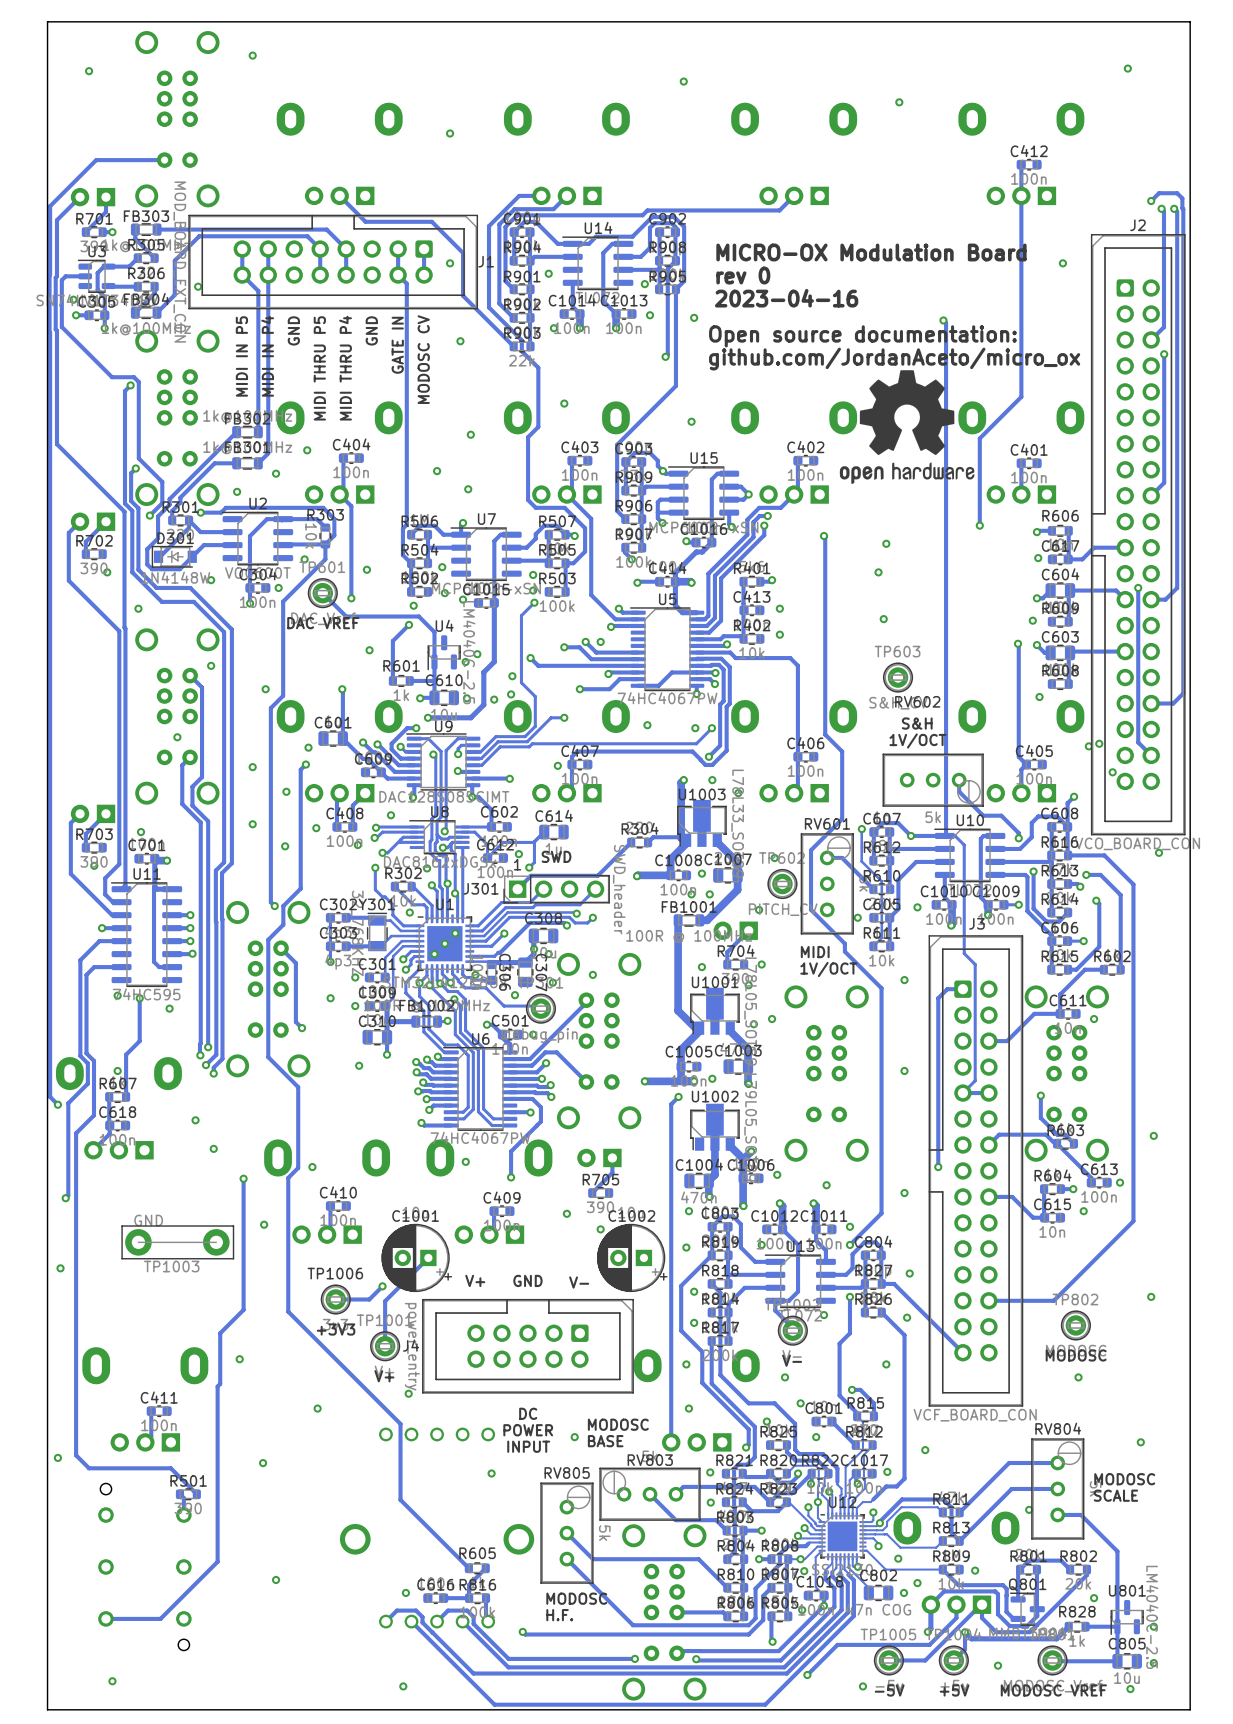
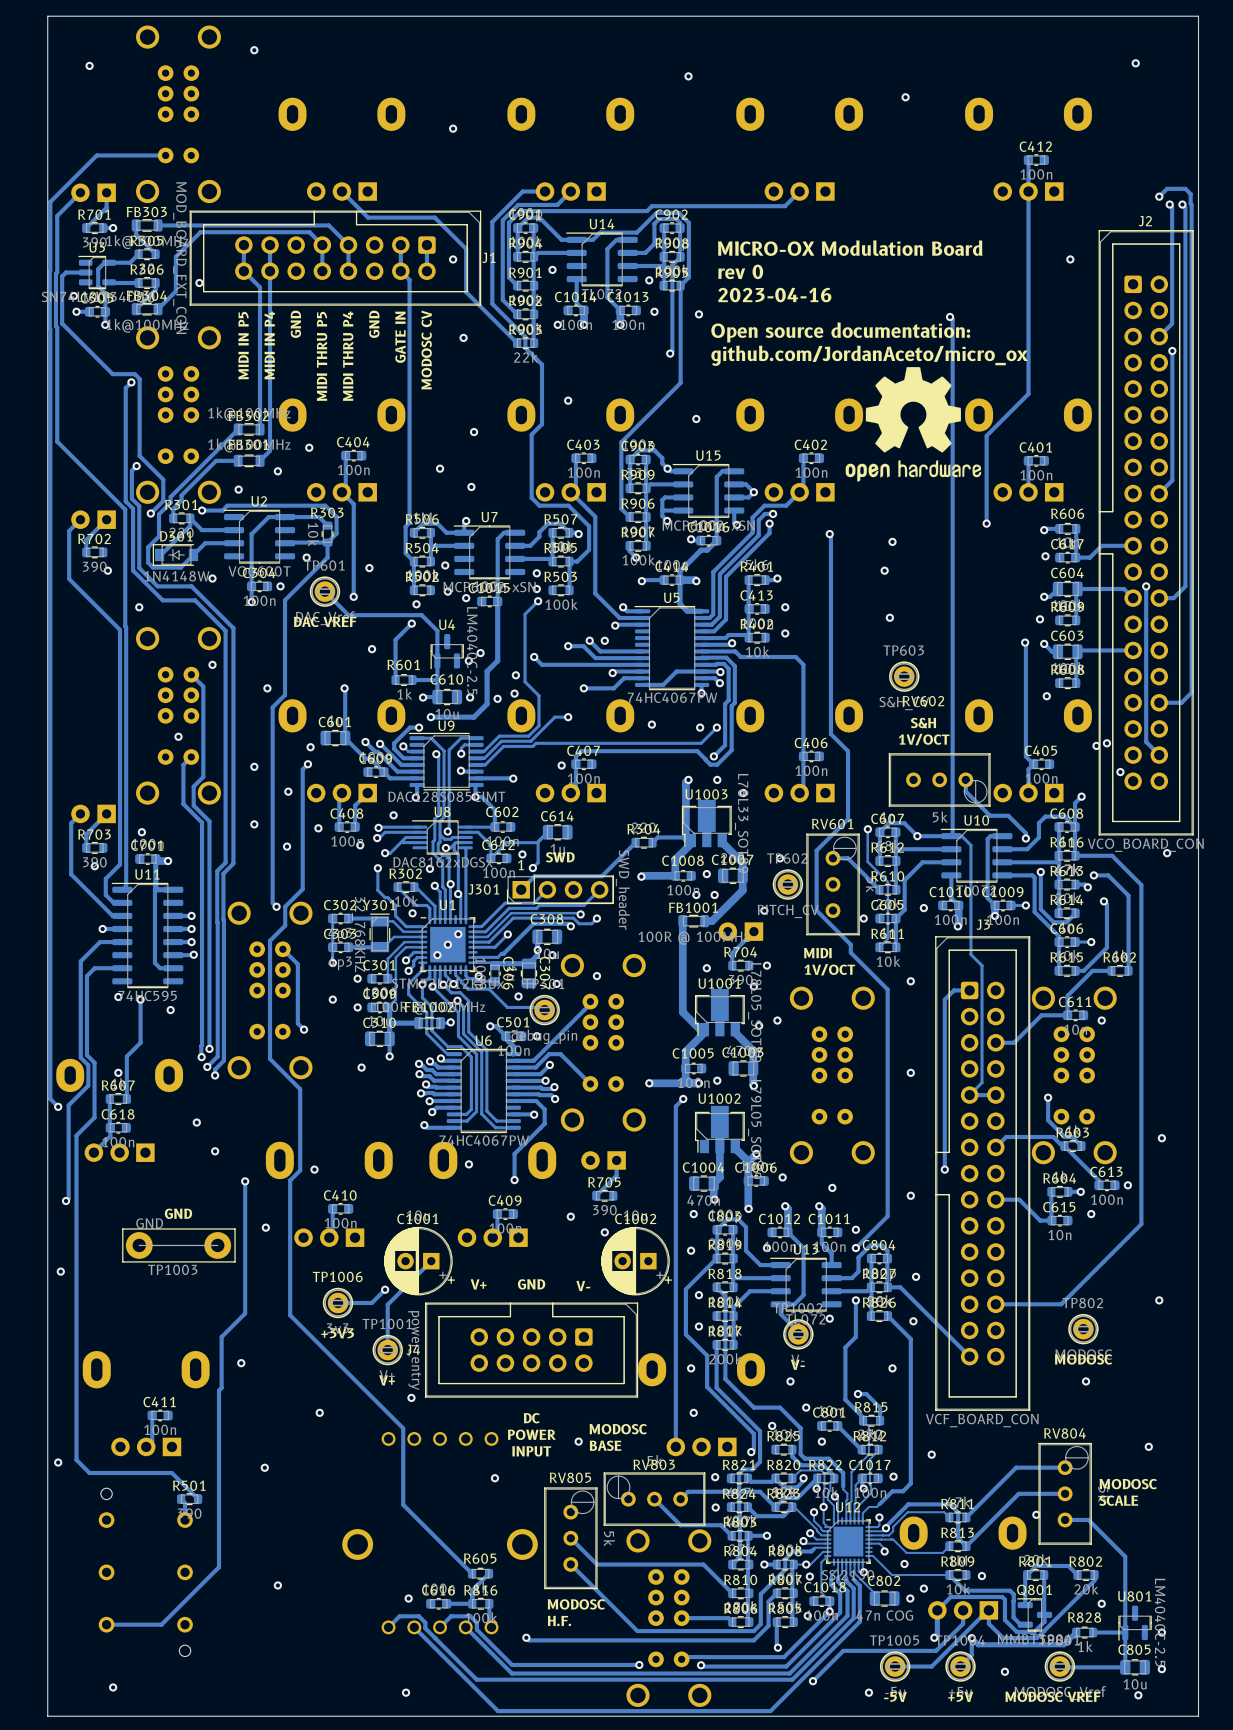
text: none -> GND (178, 1213)

